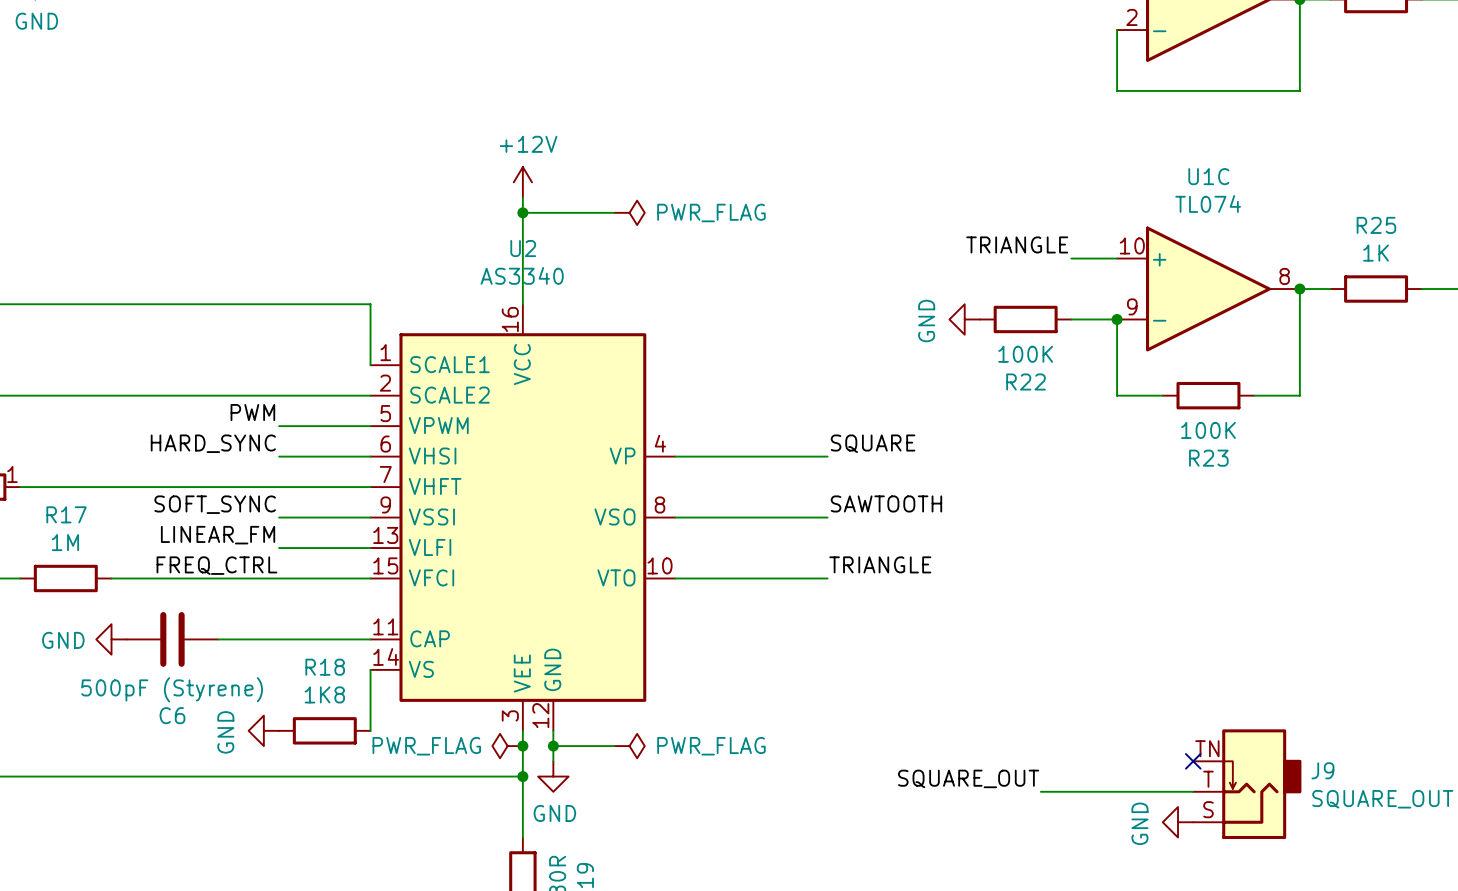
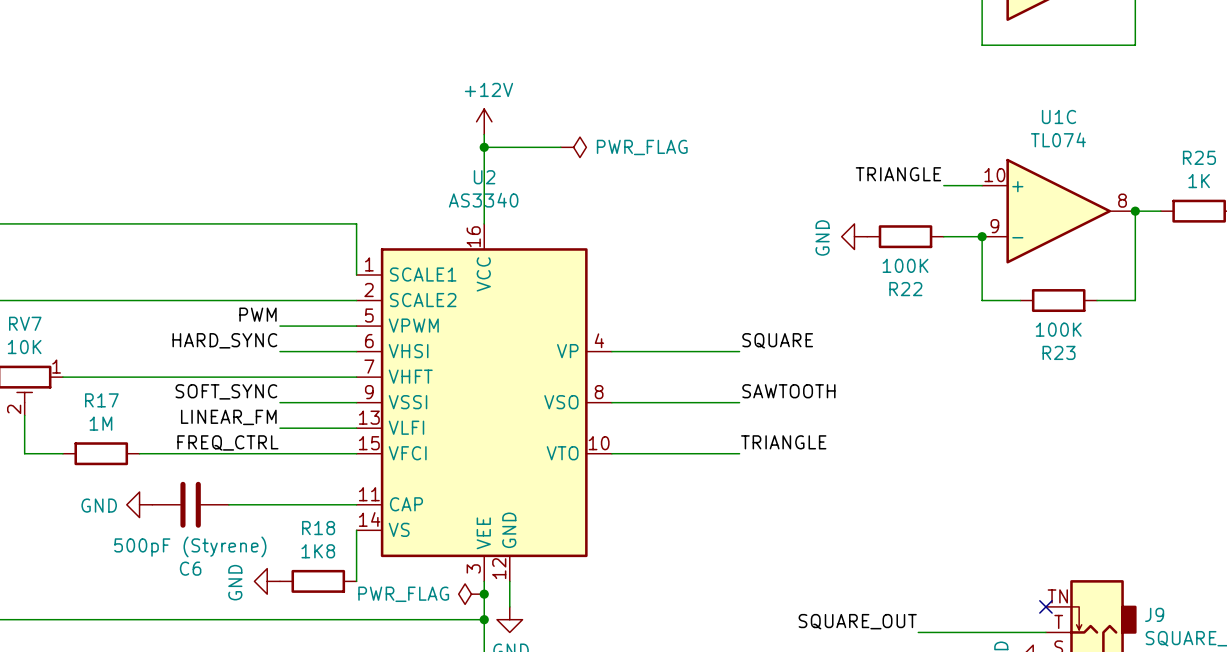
wire: (553, 746) (614, 746) -> none
junction: (553, 746) -> none
power symbol: PWR_FLAG (629, 746) -> none

